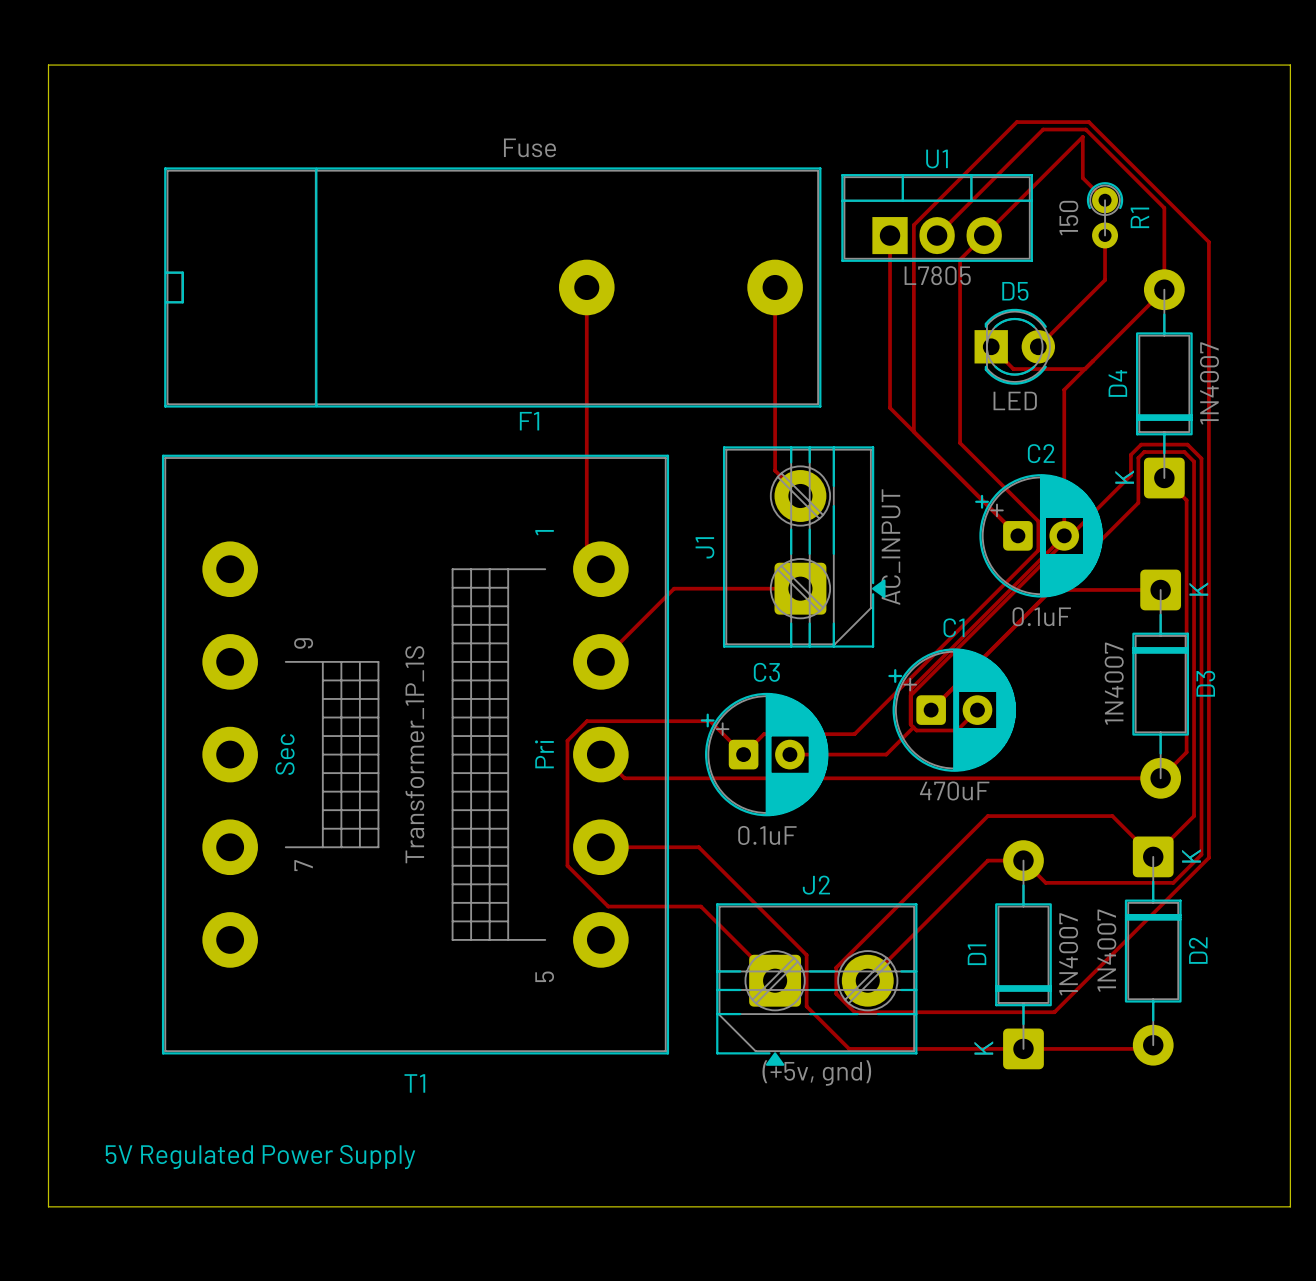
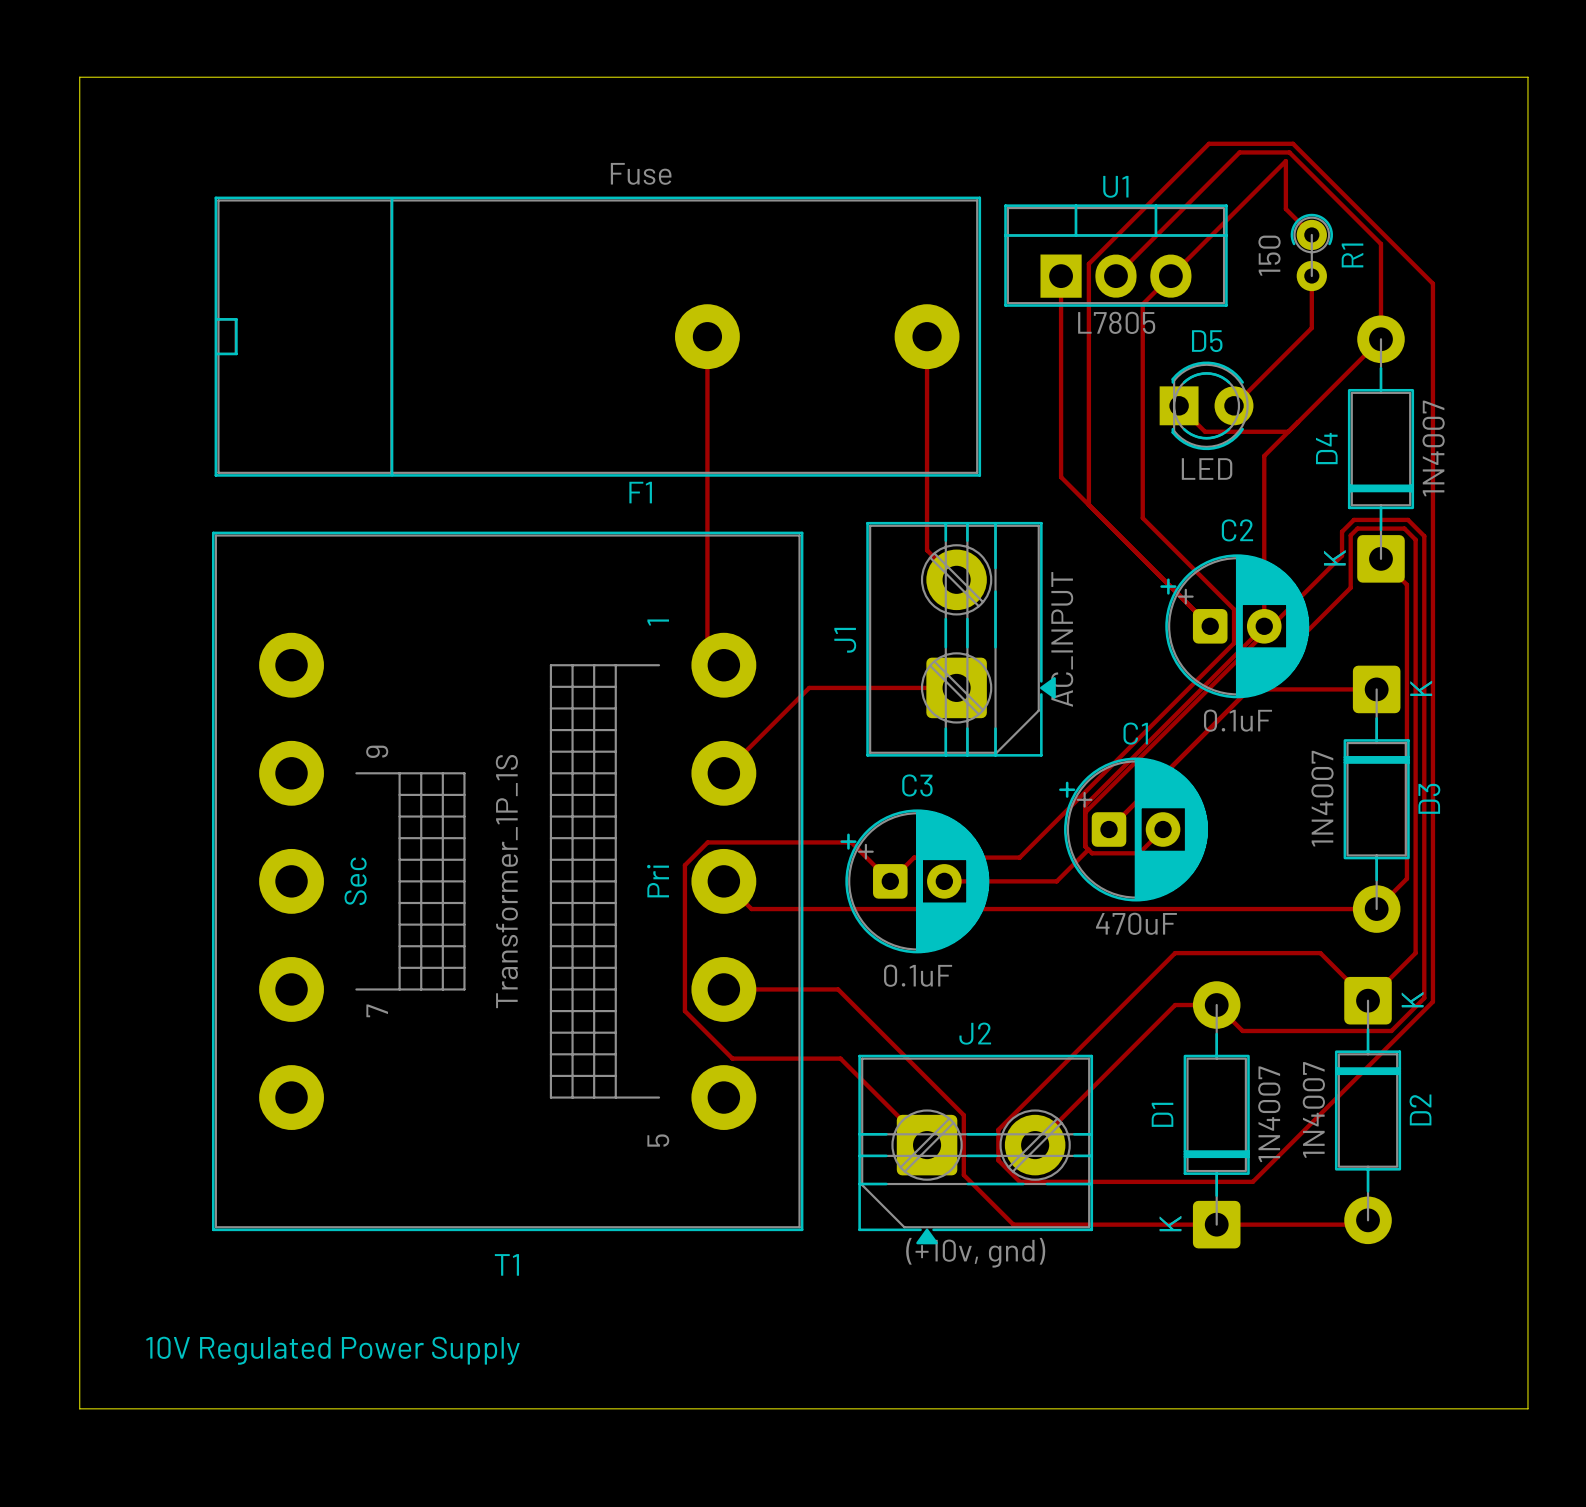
J2 value: (+5v, gnd) (816, 1073) -> (+10v, gnd) (975, 1252)
text: 5V Regulated Power Supply (260, 1157) -> 10V Regulated Power Supply (333, 1350)

